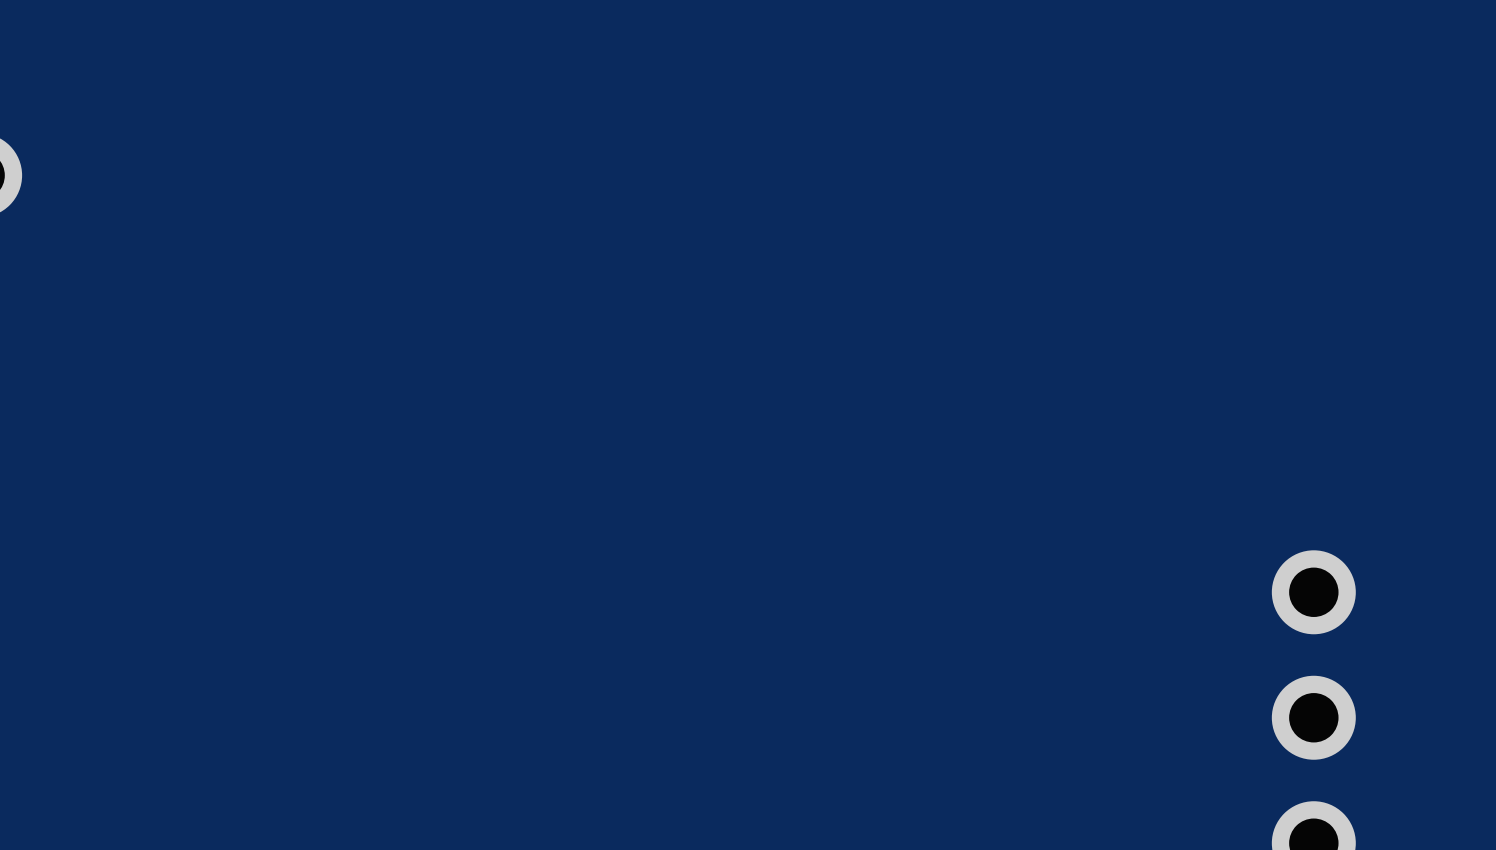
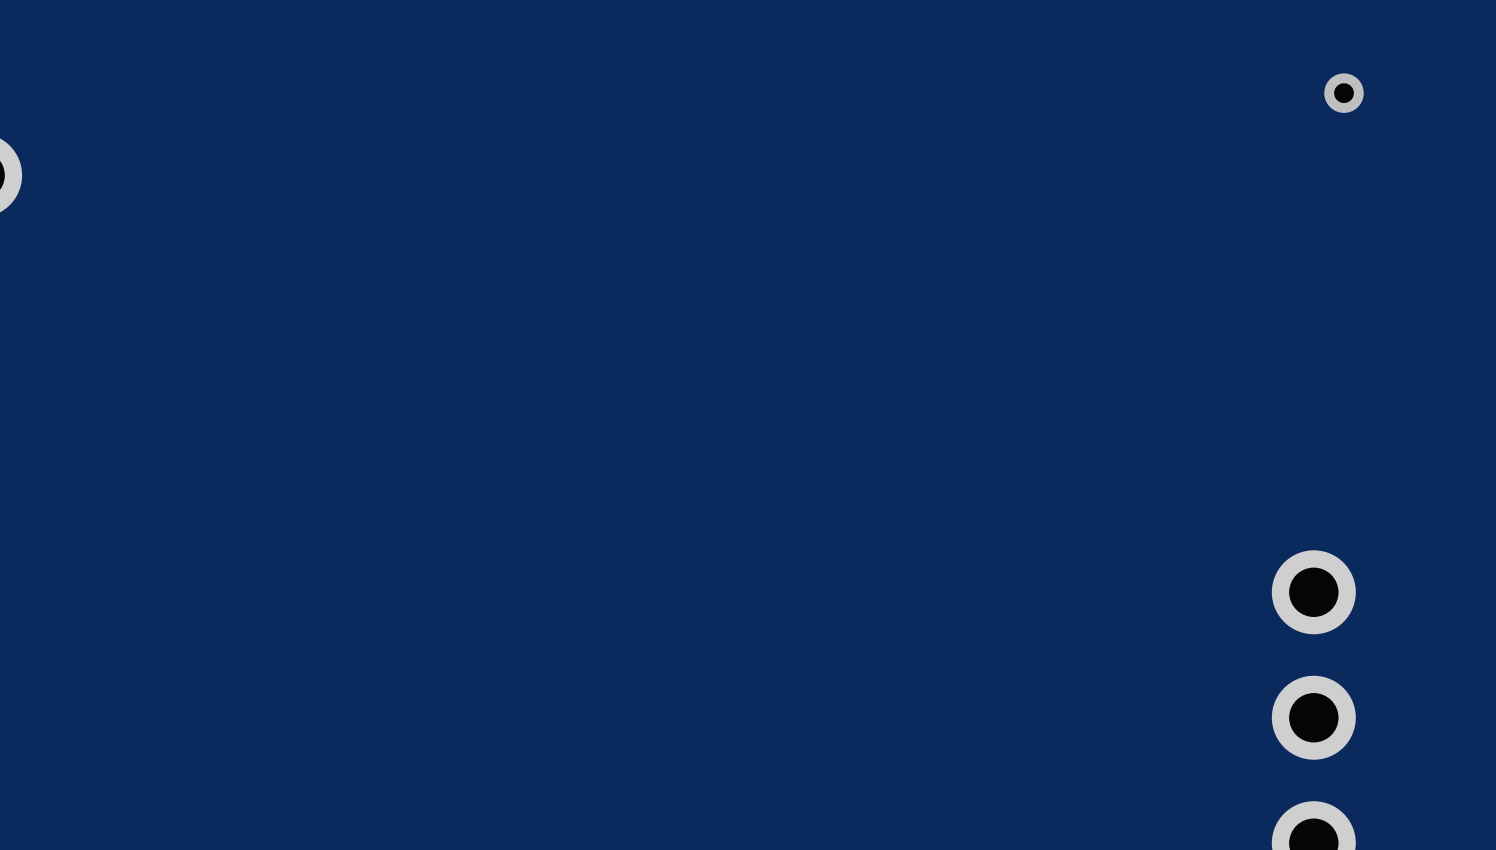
via: none -> (1344, 93)

